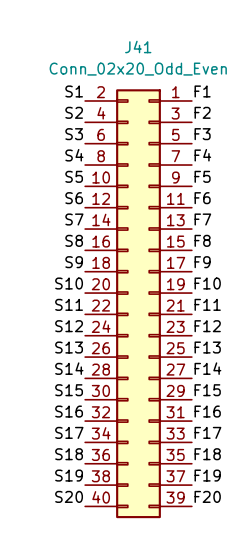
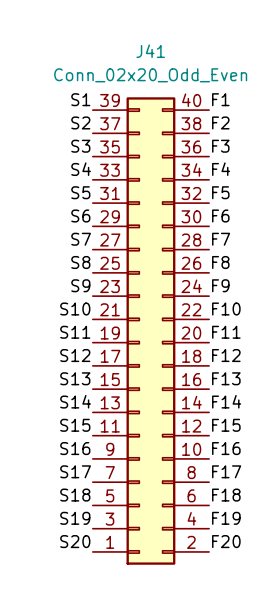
J41 rotation: 0° (138, 303) -> 180° (150, 331)

